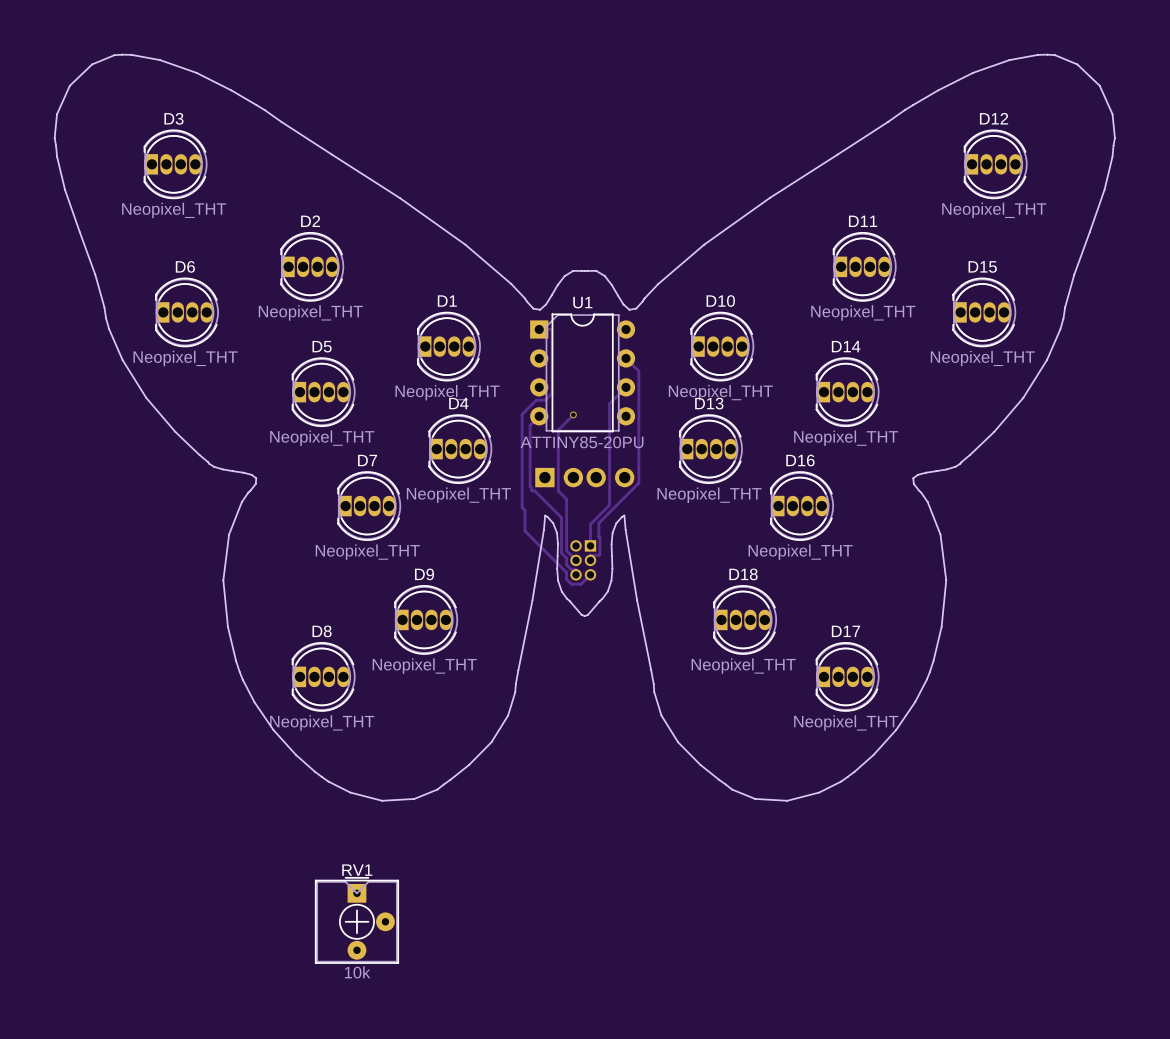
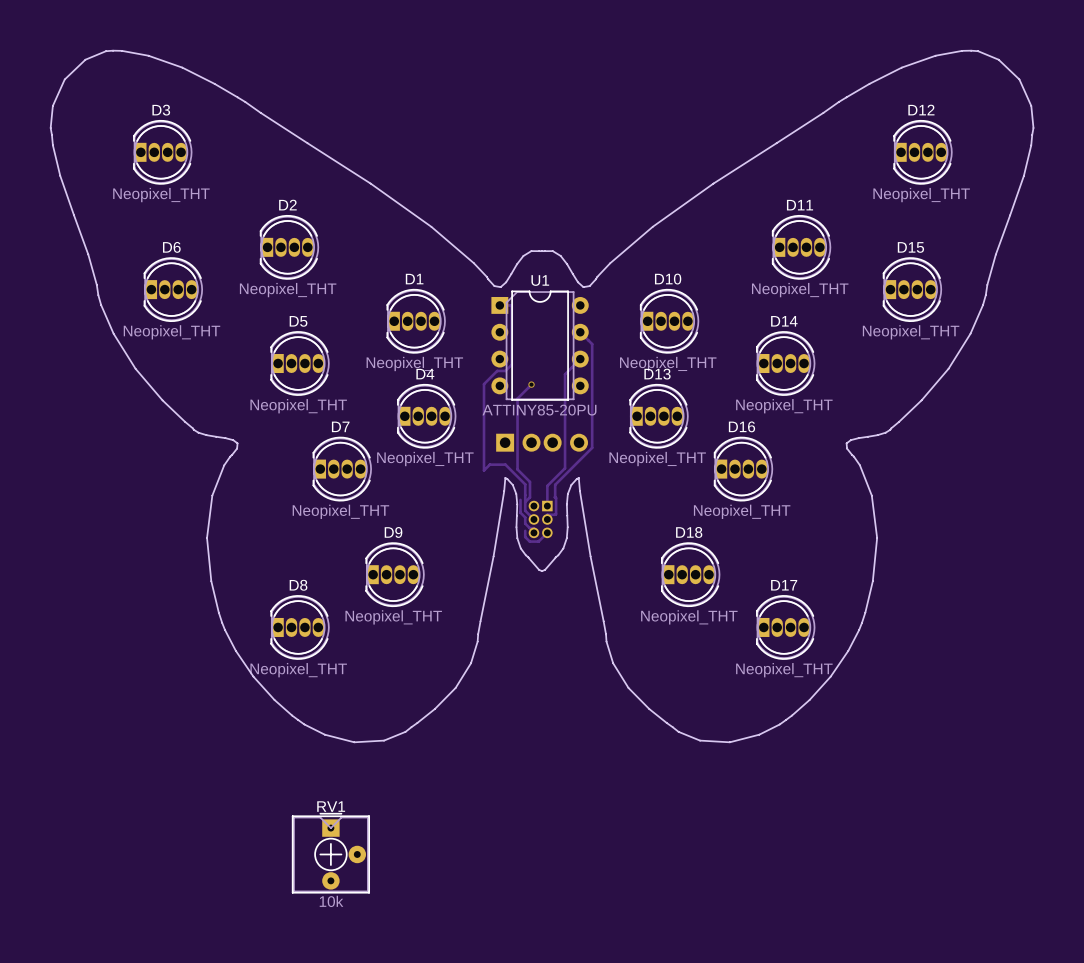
track: (539, 416) (530, 425) (530, 486) (532, 490) (534, 490) (561, 517) (561, 539) -> none
track: (558, 490) (566, 499) (566, 522) -> (517, 455) (517, 469) (529, 481) (529, 497) (525, 502)
track: (522, 507) (524, 510) (524, 531) (566, 572) -> (484, 470) (489, 464) (505, 464) (525, 484)

